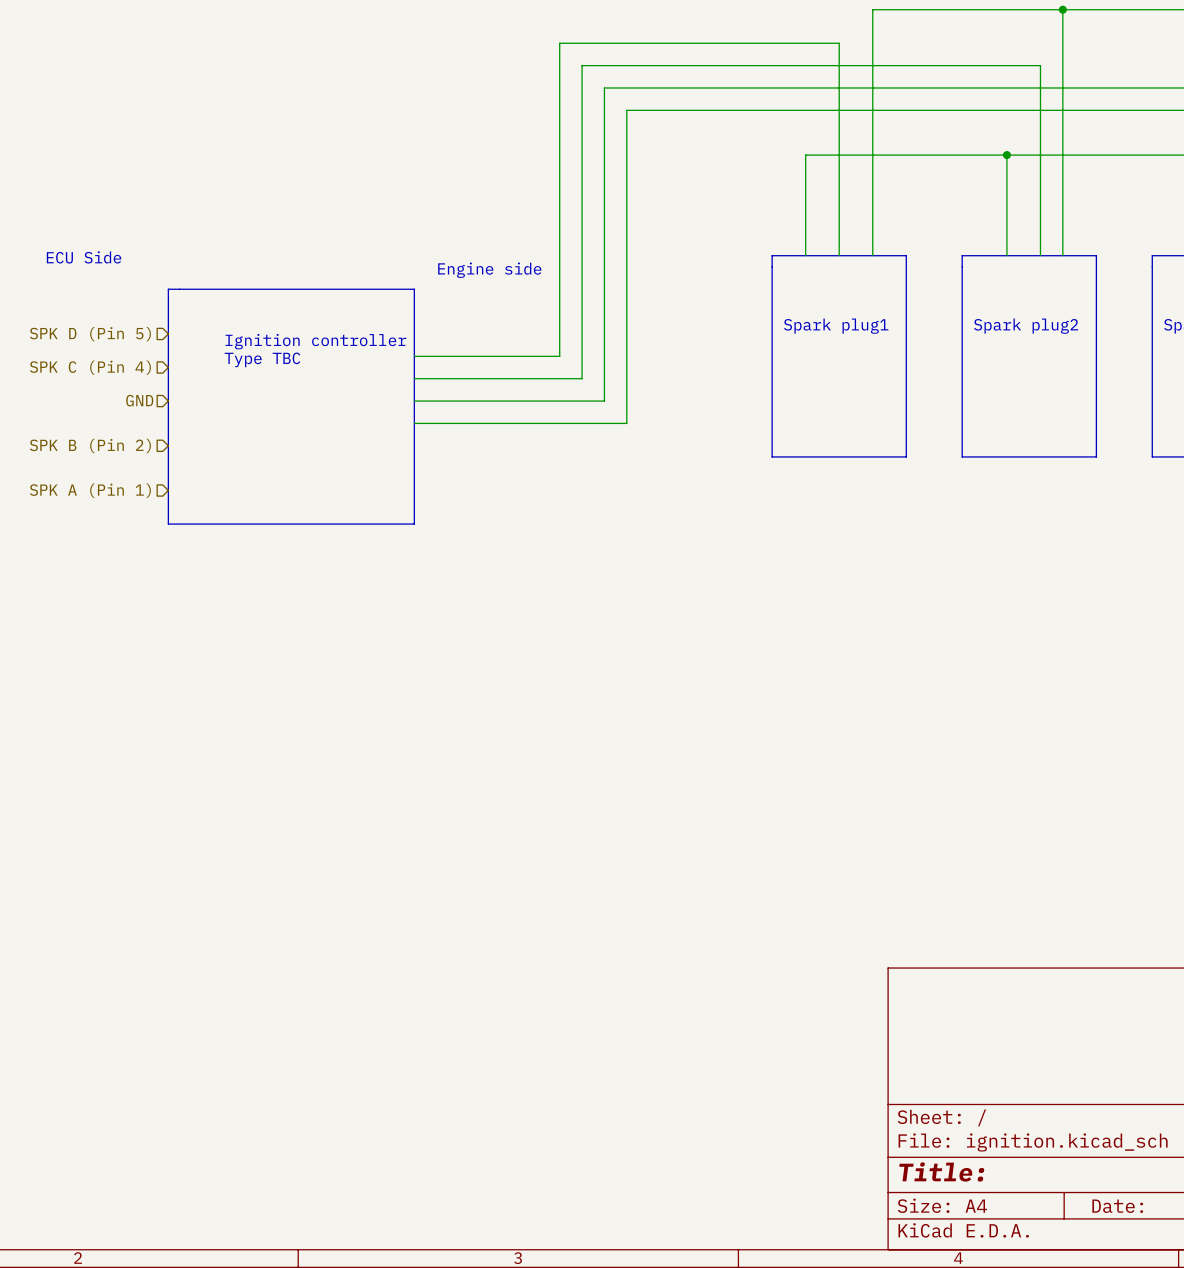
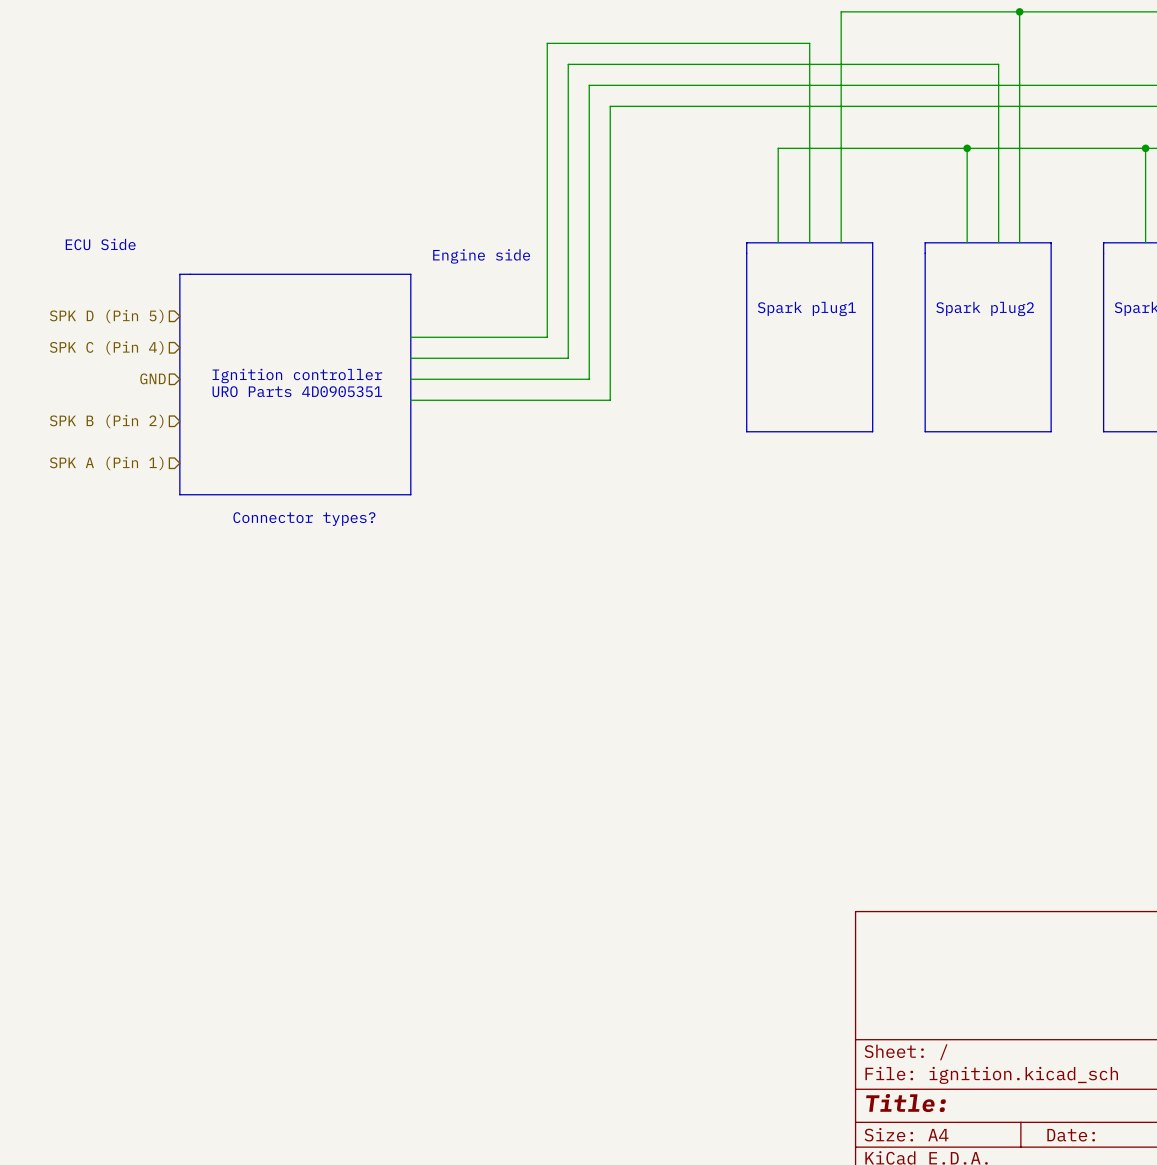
text position: Ignition controller (315, 341) -> Ignition controller (297, 375)
text: Type TBC (262, 359) -> none
text: none -> URO Parts 4D0905351 (297, 391)
text: none -> Connector types? (304, 519)

